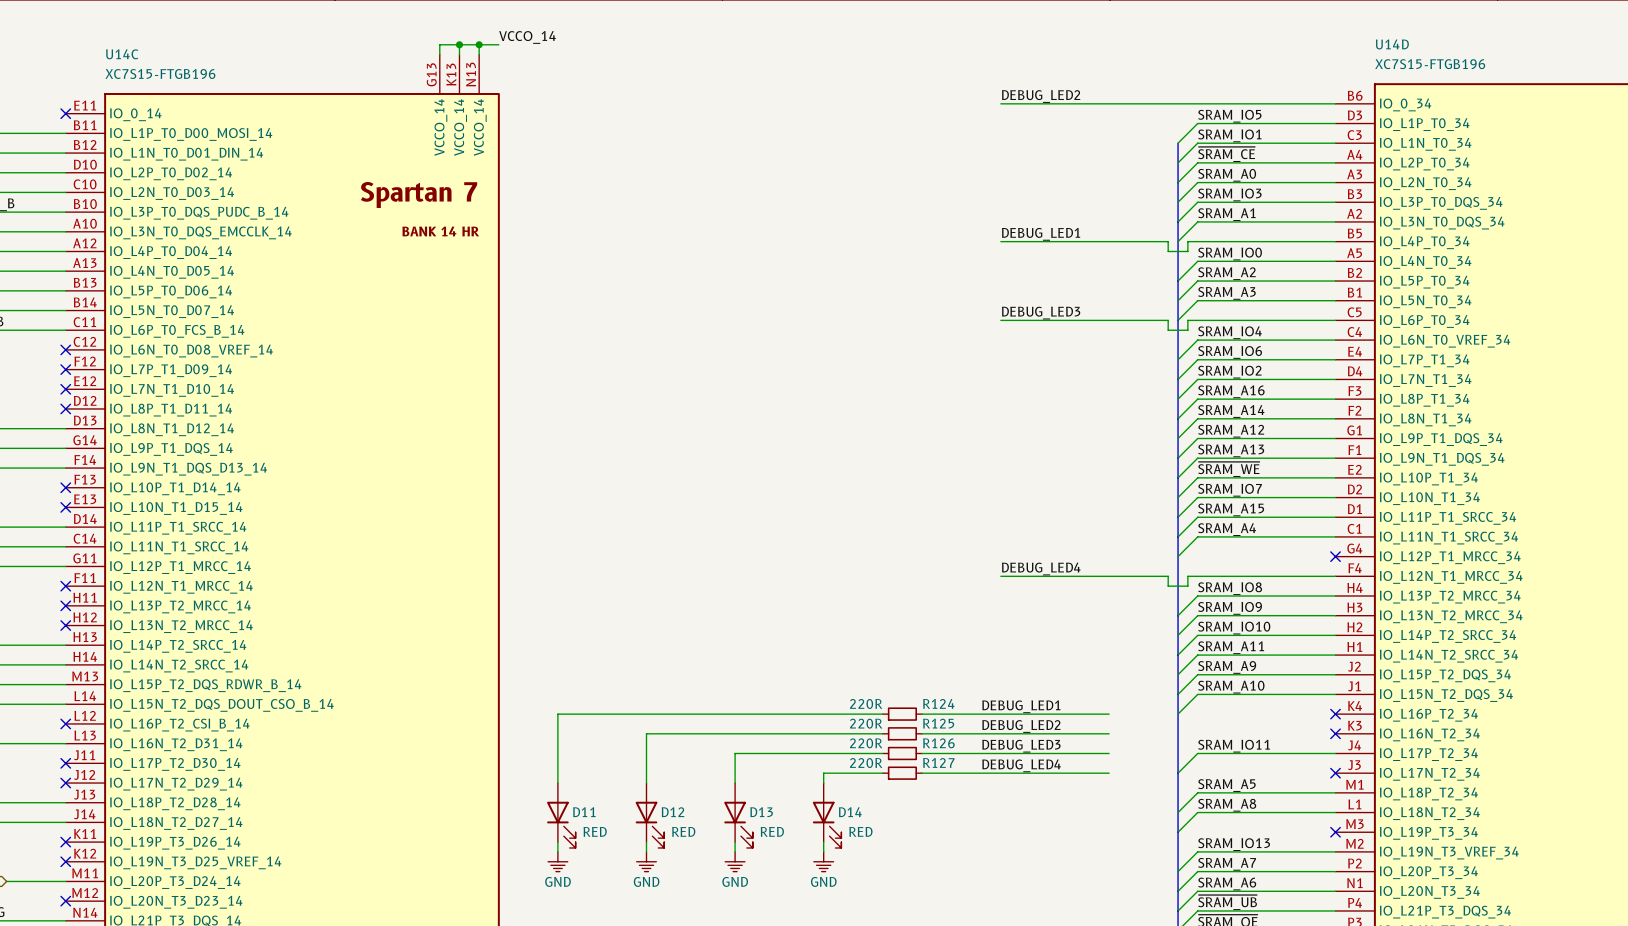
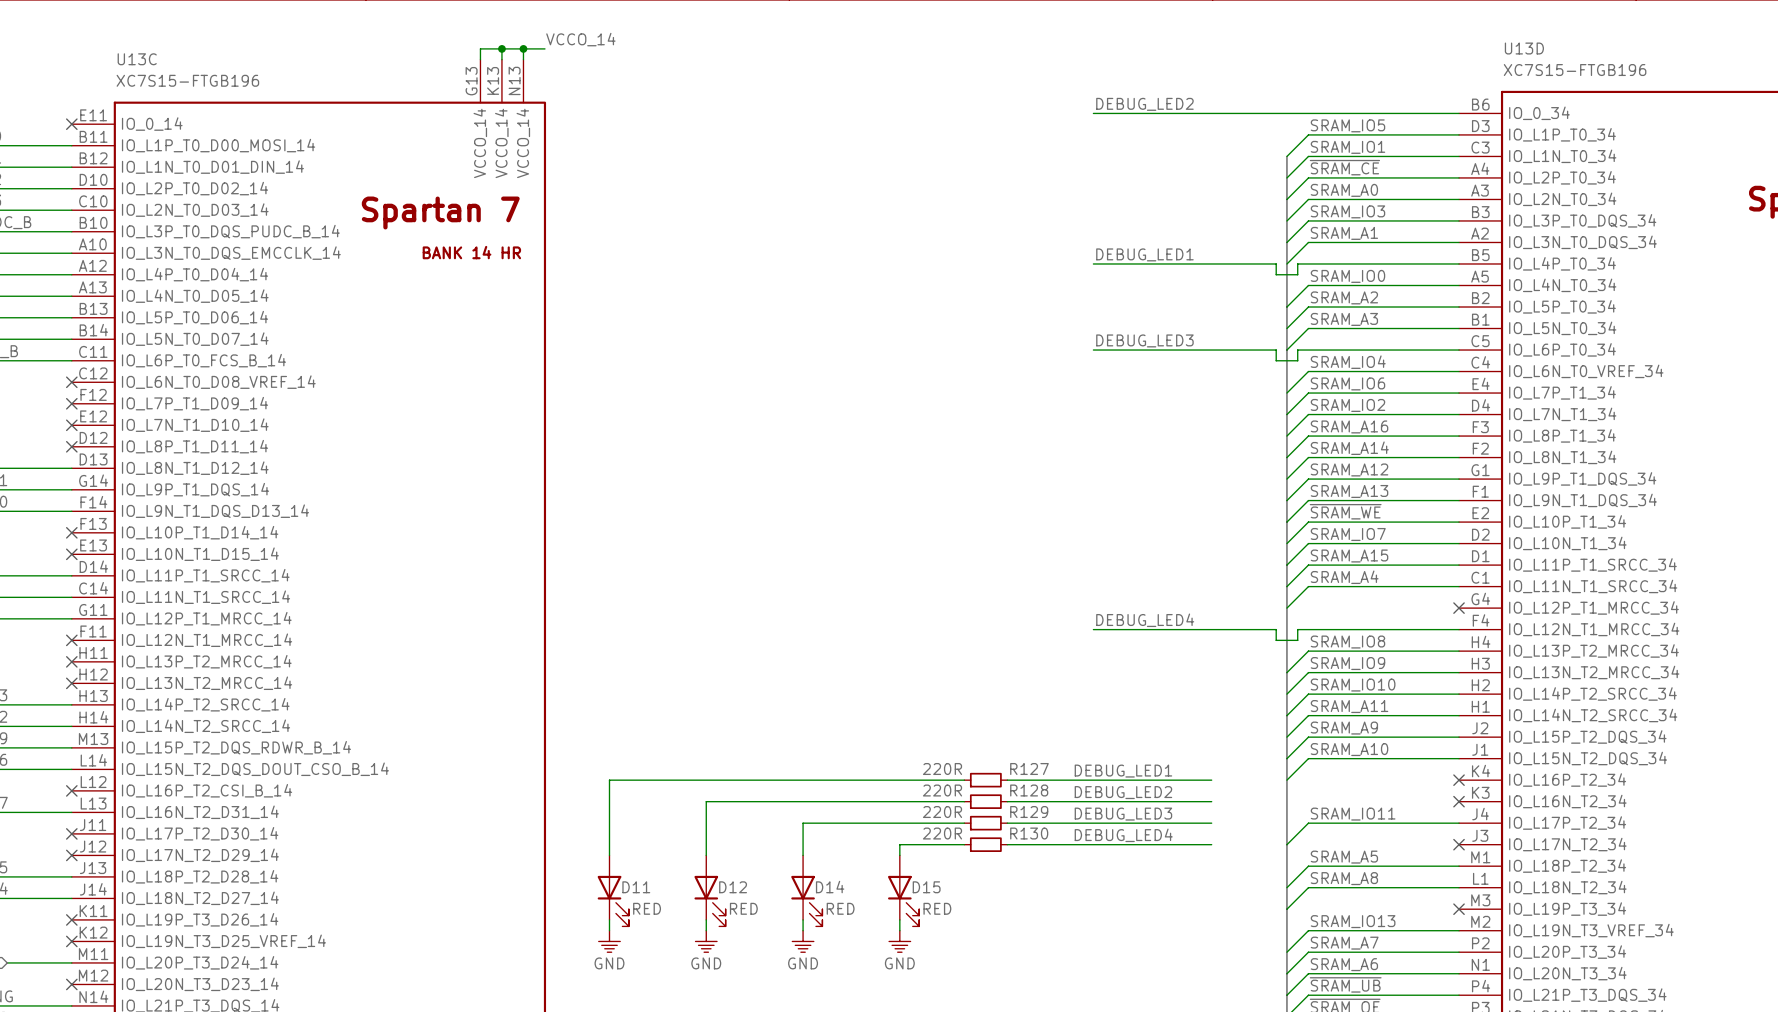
U14D name: U14D (1392, 44) -> U13D (1524, 48)
U14C name: U14C (122, 54) -> U13C (137, 59)
R124 name: R124 (938, 703) -> R127 (1029, 769)
R125 name: R125 (938, 723) -> R128 (1029, 790)
R126 name: R126 (938, 743) -> R129 (1029, 812)
R127 name: R127 (938, 762) -> R130 (1029, 833)
D13 name: D13 (761, 812) -> D14 (830, 887)
D14 name: D14 (850, 812) -> D15 (926, 887)

